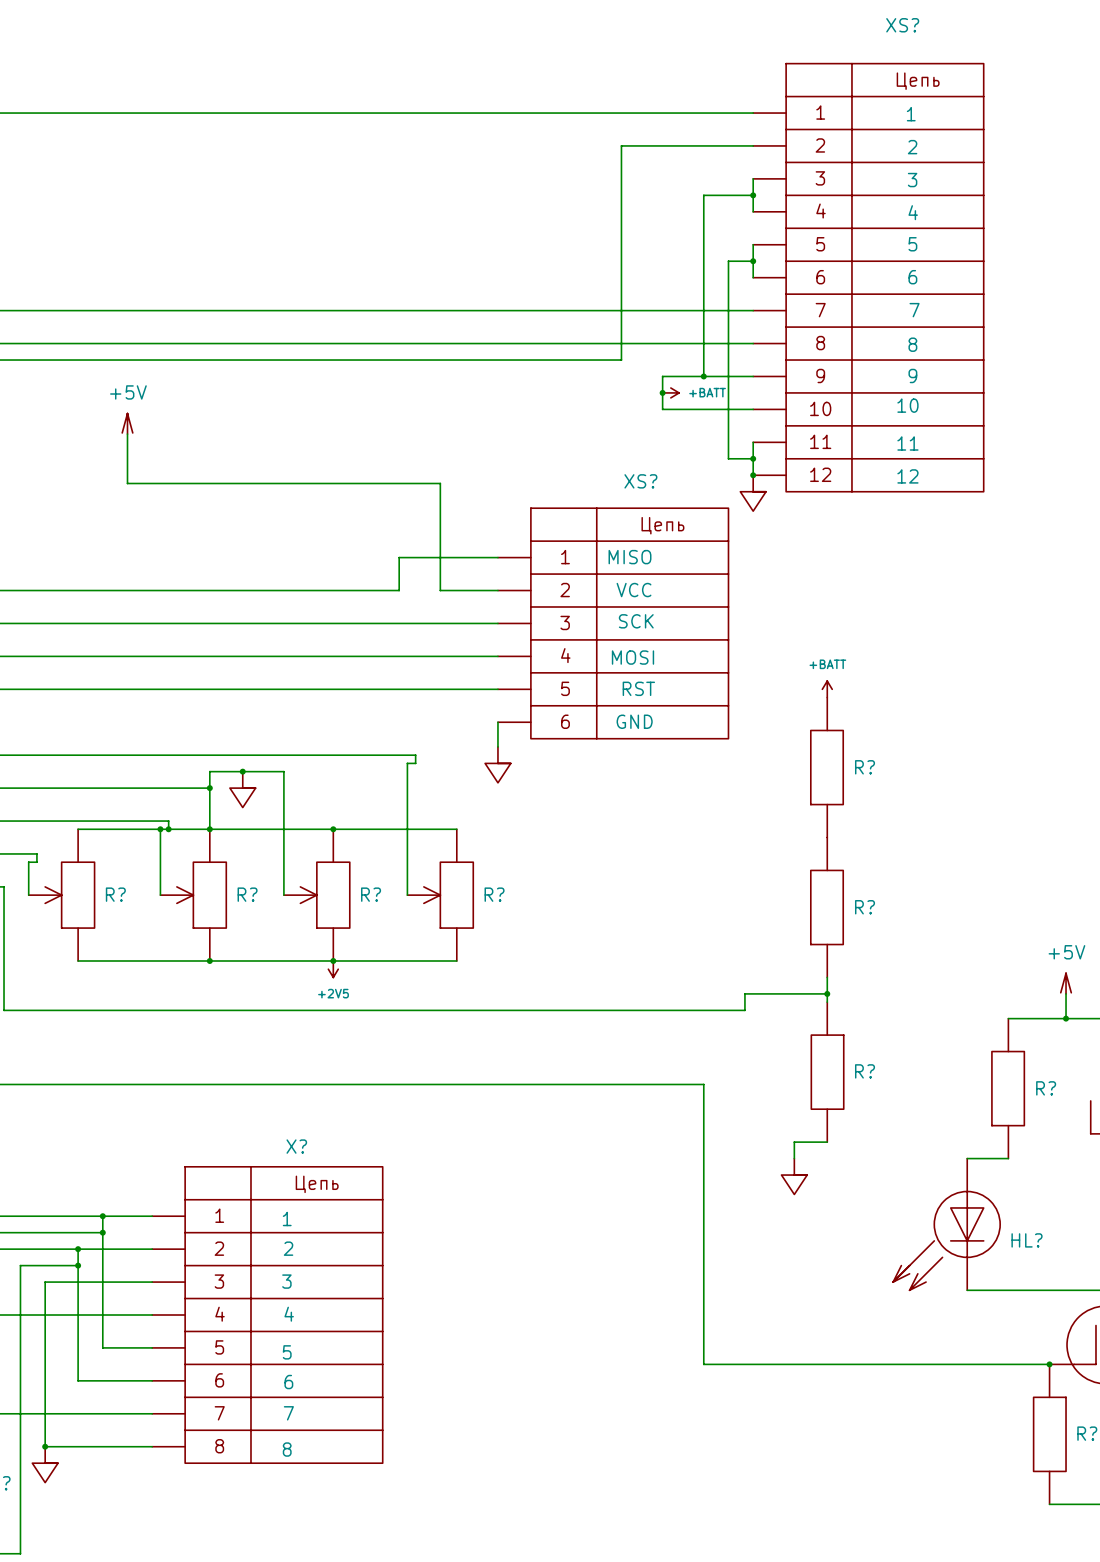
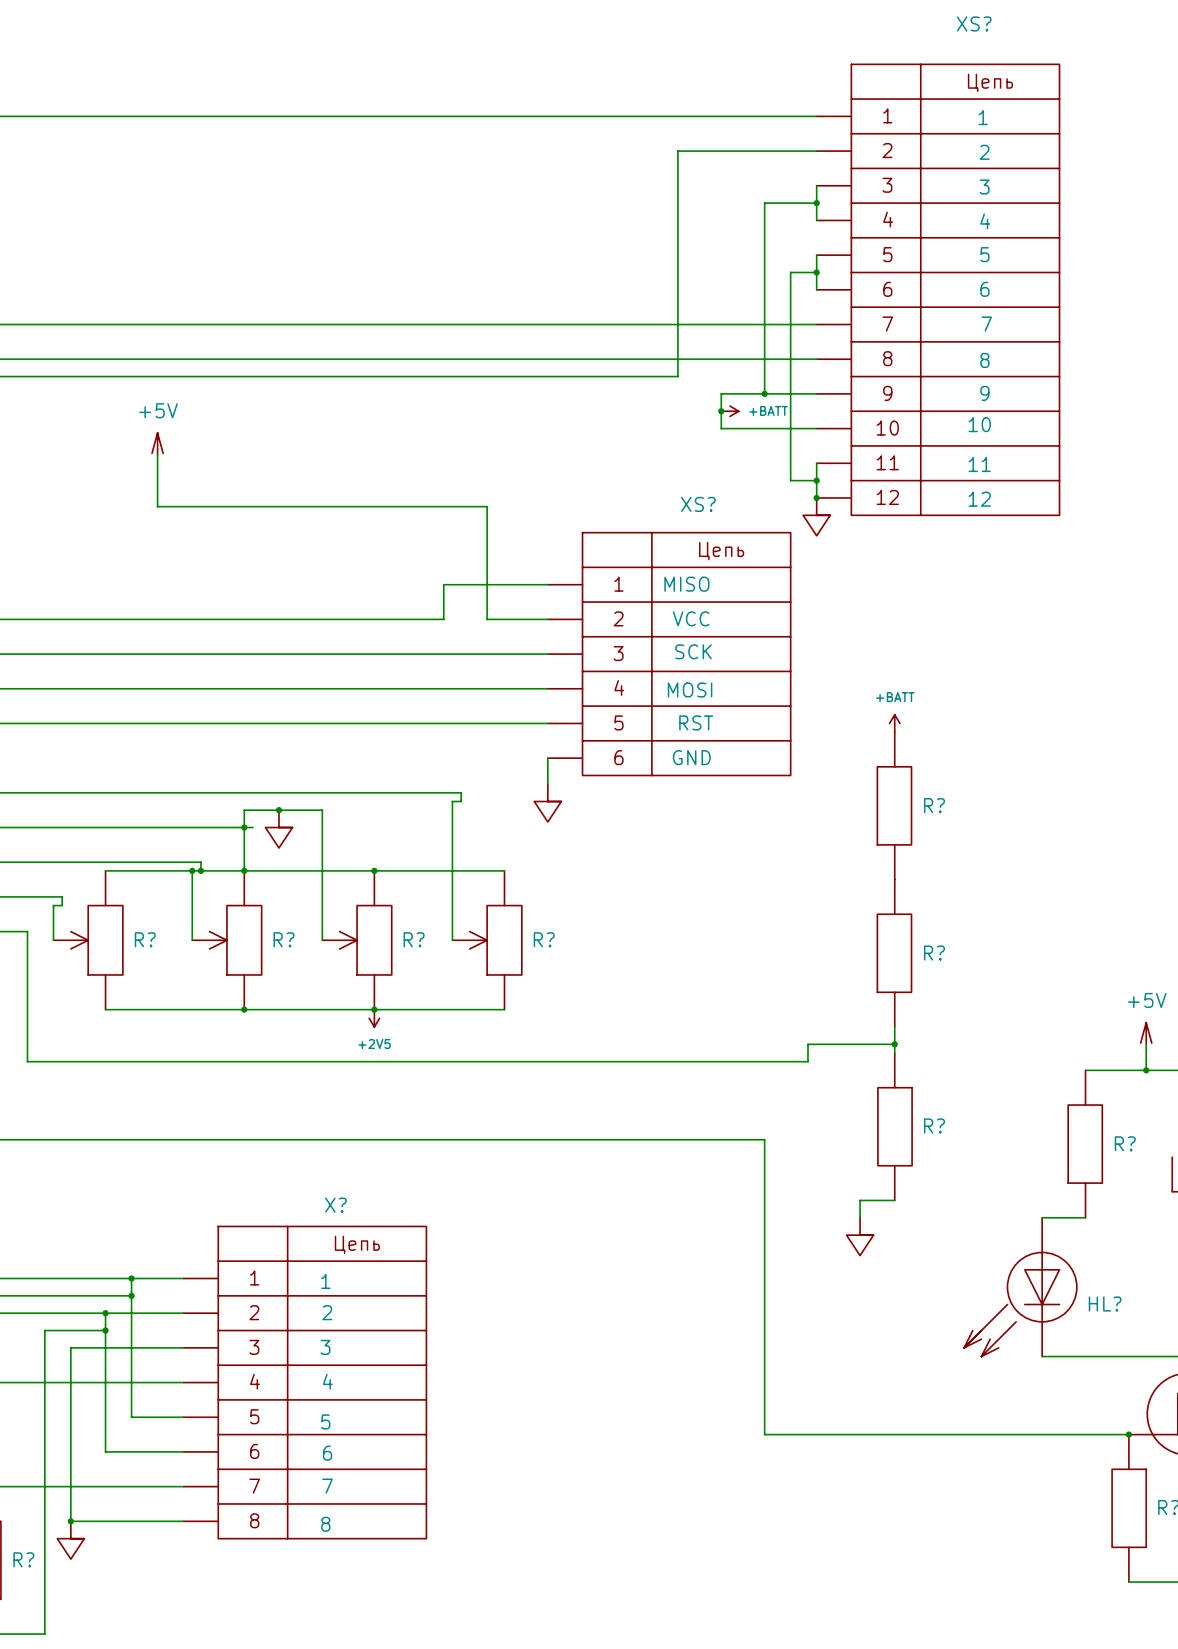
wire: none -> (244, 827) (252, 827)

